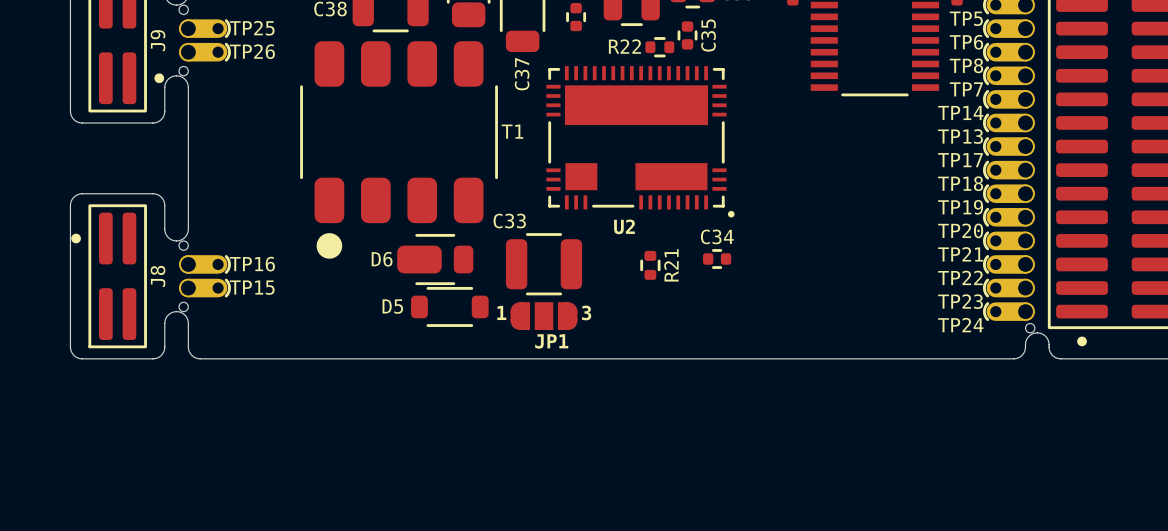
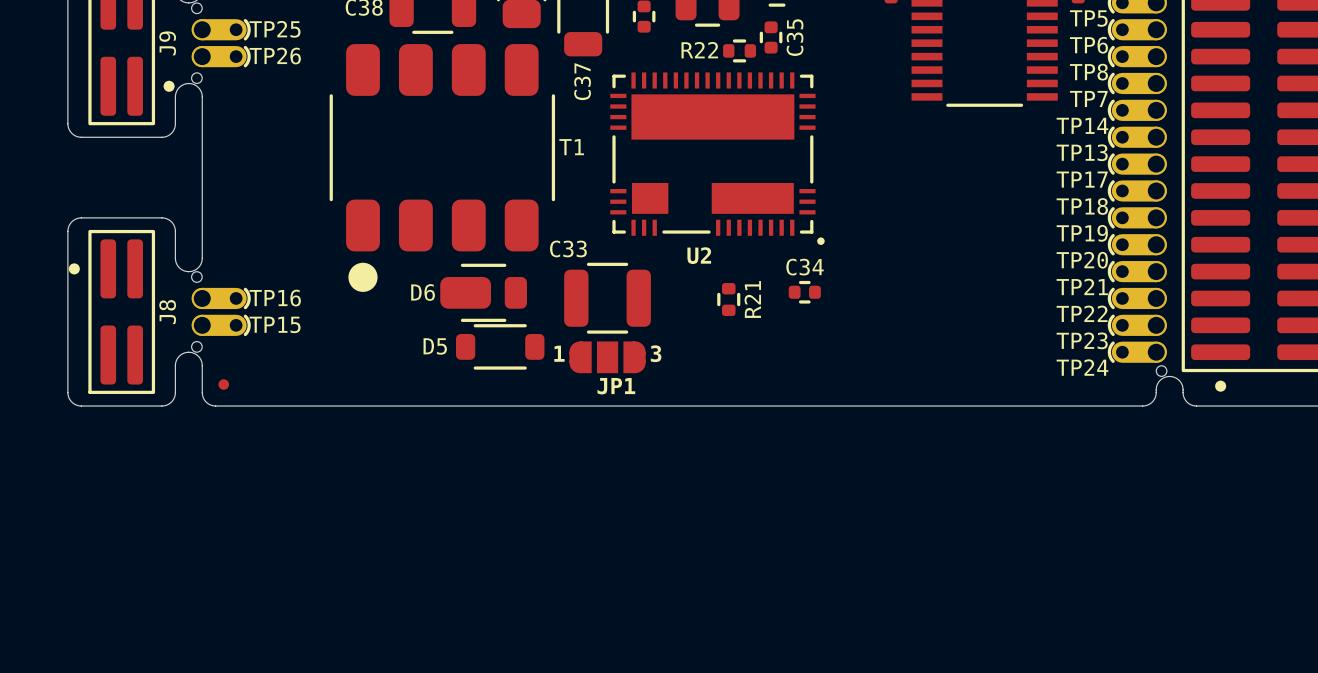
part: none -> (223, 384)

